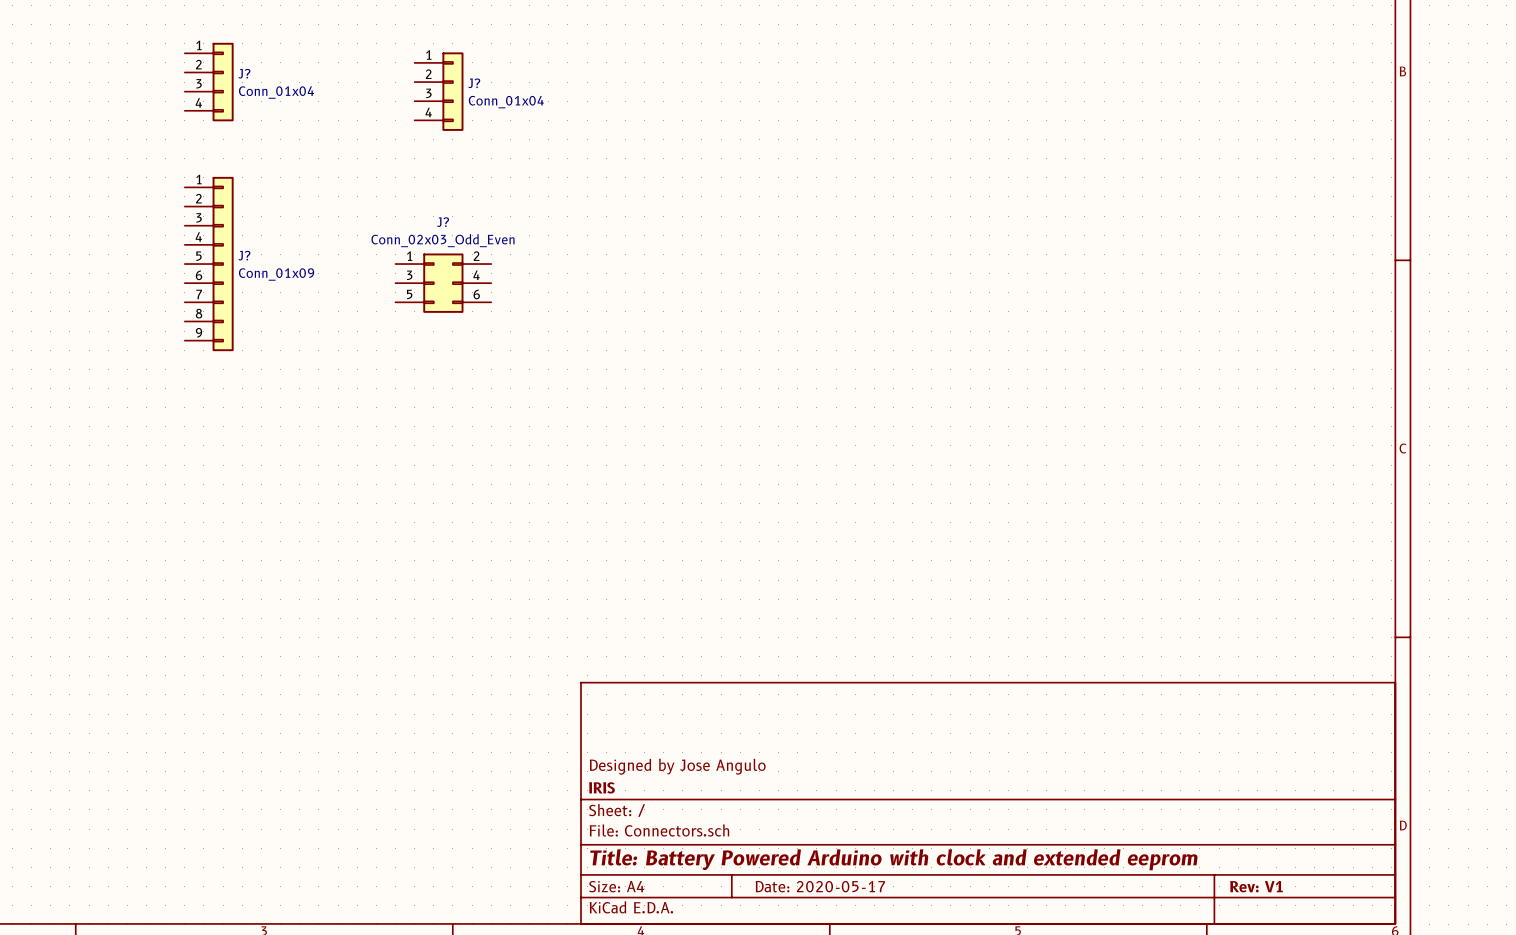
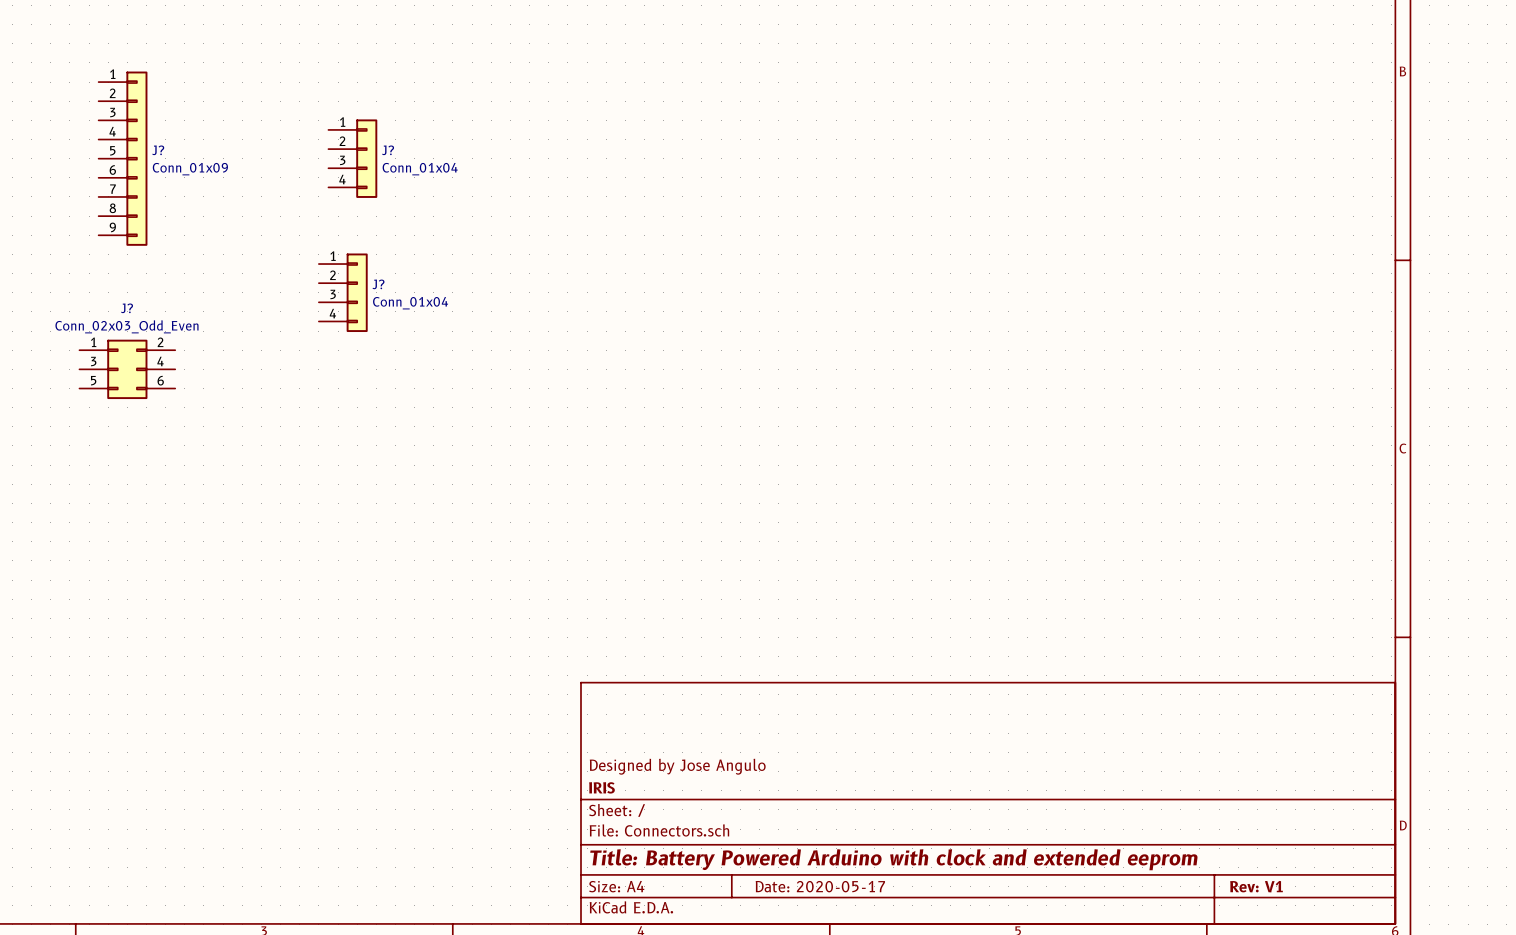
J?: Conn_01x04 (209, 82) -> none
J?: Conn_01x04 (439, 91) -> none
J?: none -> Conn_01x04 (352, 158)
J? position: (209, 264) -> (123, 158)
J?: Conn_02x03_Odd_Even (443, 283) -> none
J?: none -> Conn_01x04 (343, 292)
J?: none -> Conn_02x03_Odd_Even (127, 369)

